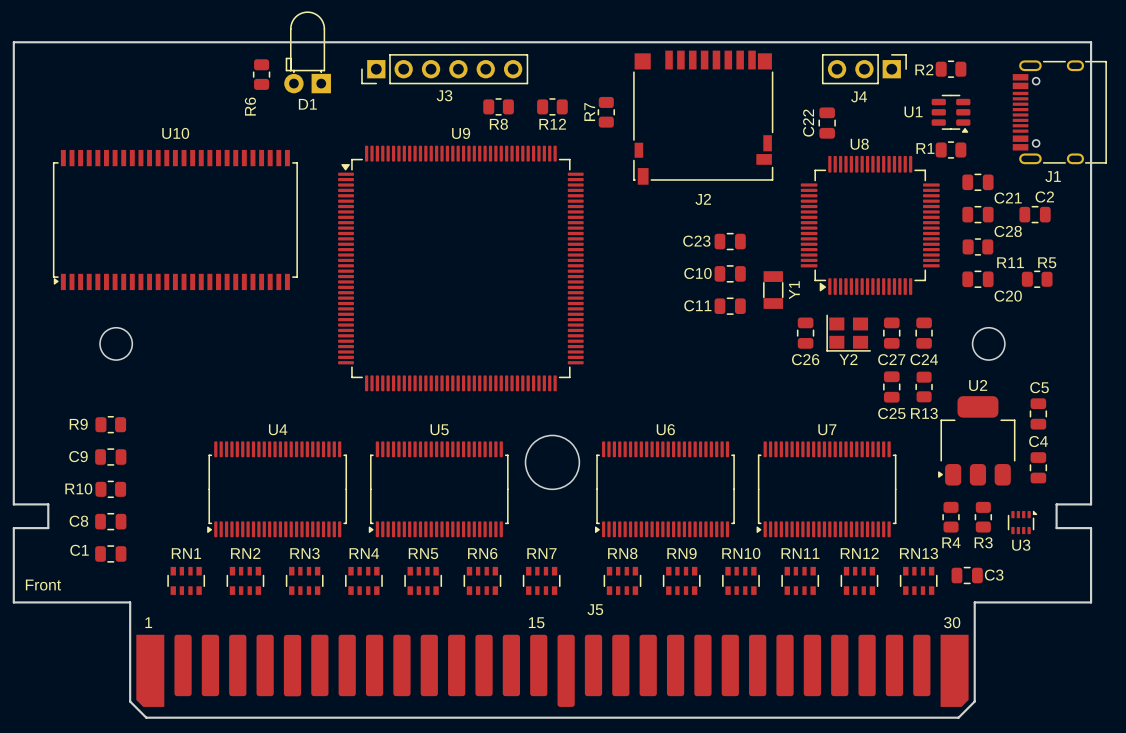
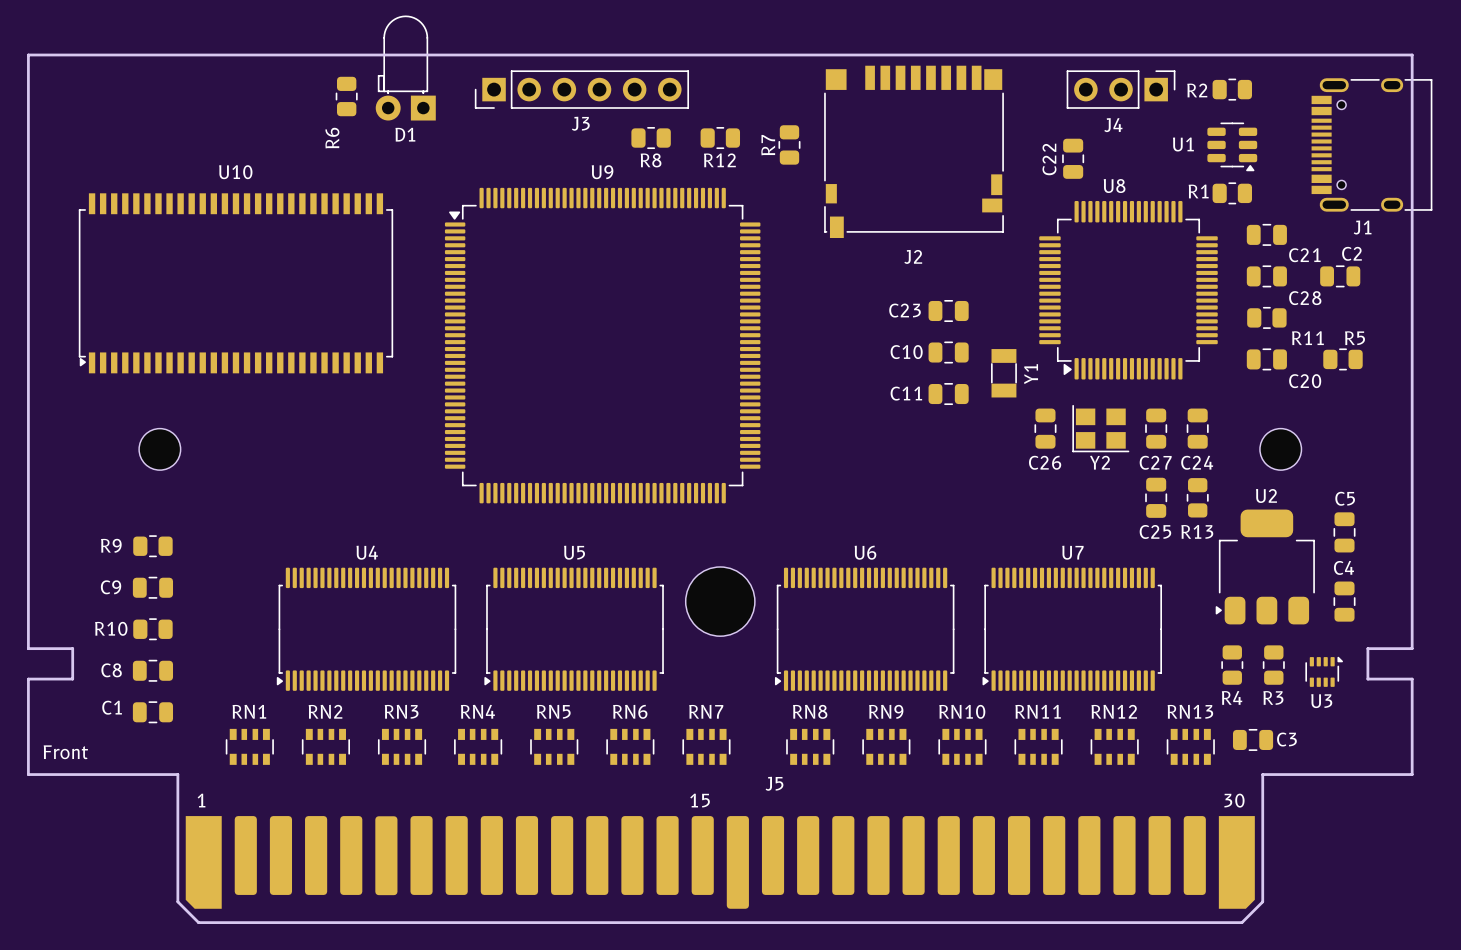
J5 footprint: [12, 41, 1093, 719] -> [27, 53, 1414, 925]

